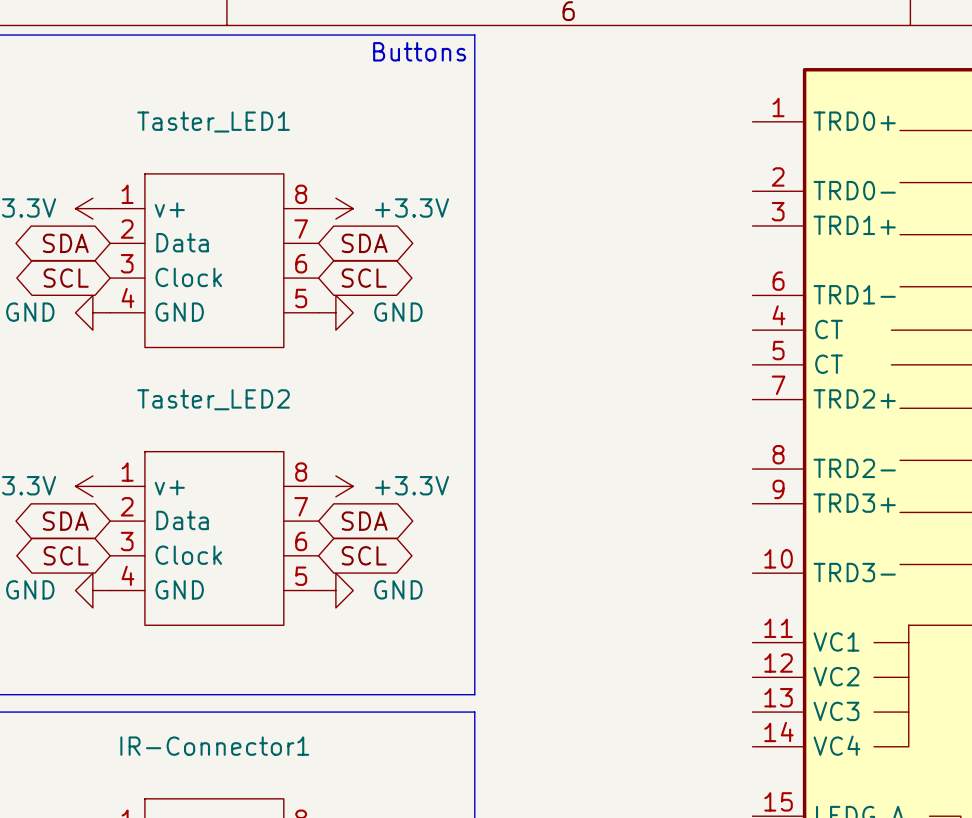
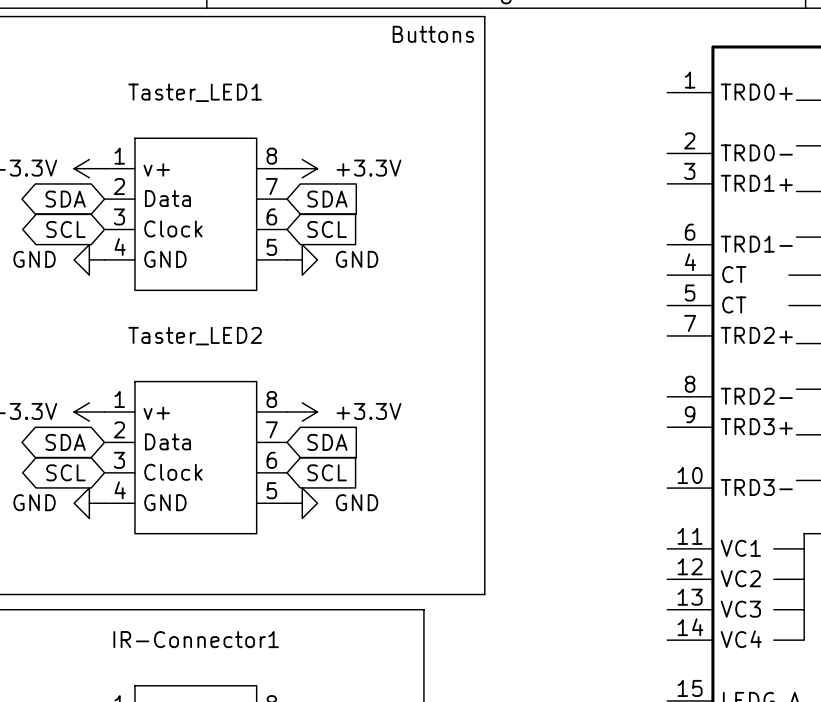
line: (474, 35) (474, 694) -> (423, 16) (484, 16) (484, 594) (423, 594)
text position: Buttons (419, 51) -> Buttons (433, 34)
global label shape: bidirectional (364, 243) -> input (327, 199)
global label shape: bidirectional (364, 278) -> input (327, 229)
global label shape: bidirectional (364, 521) -> input (327, 442)
global label shape: bidirectional (364, 555) -> input (327, 472)

